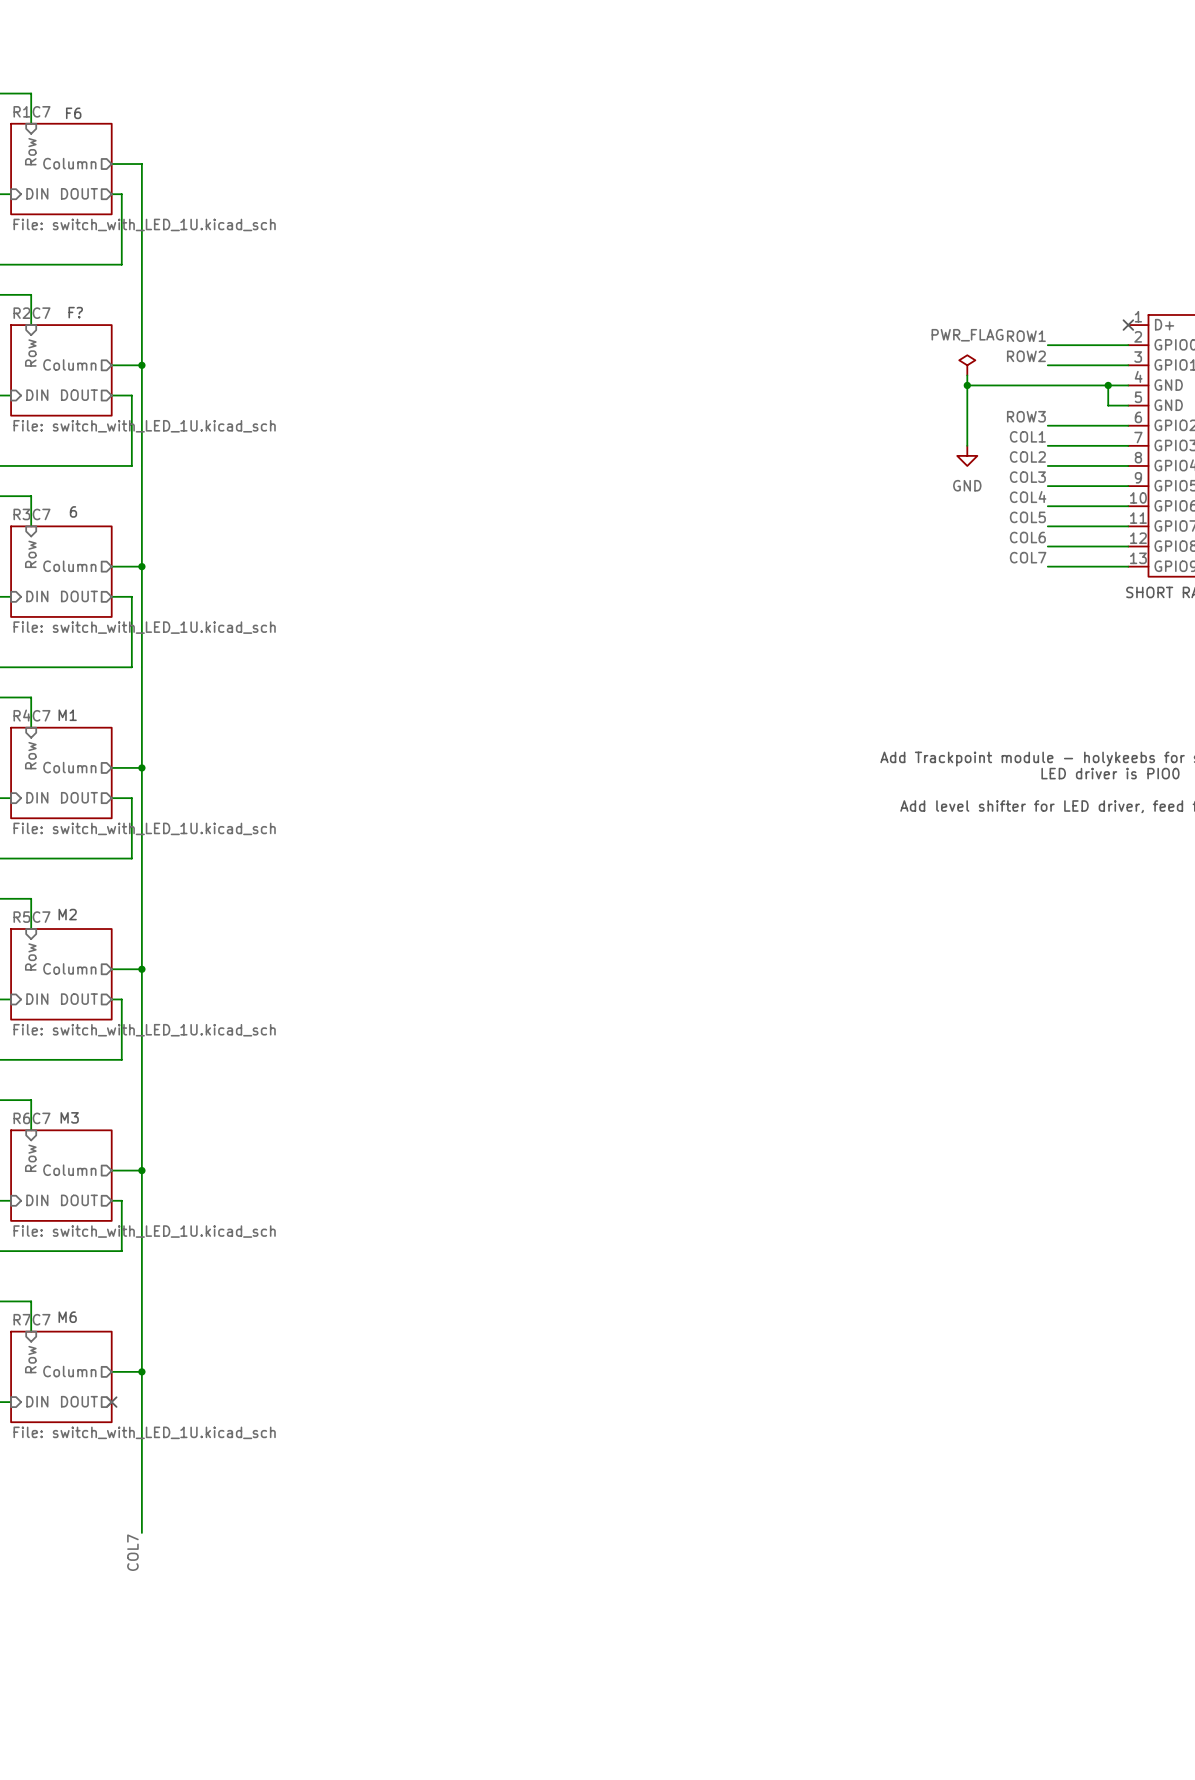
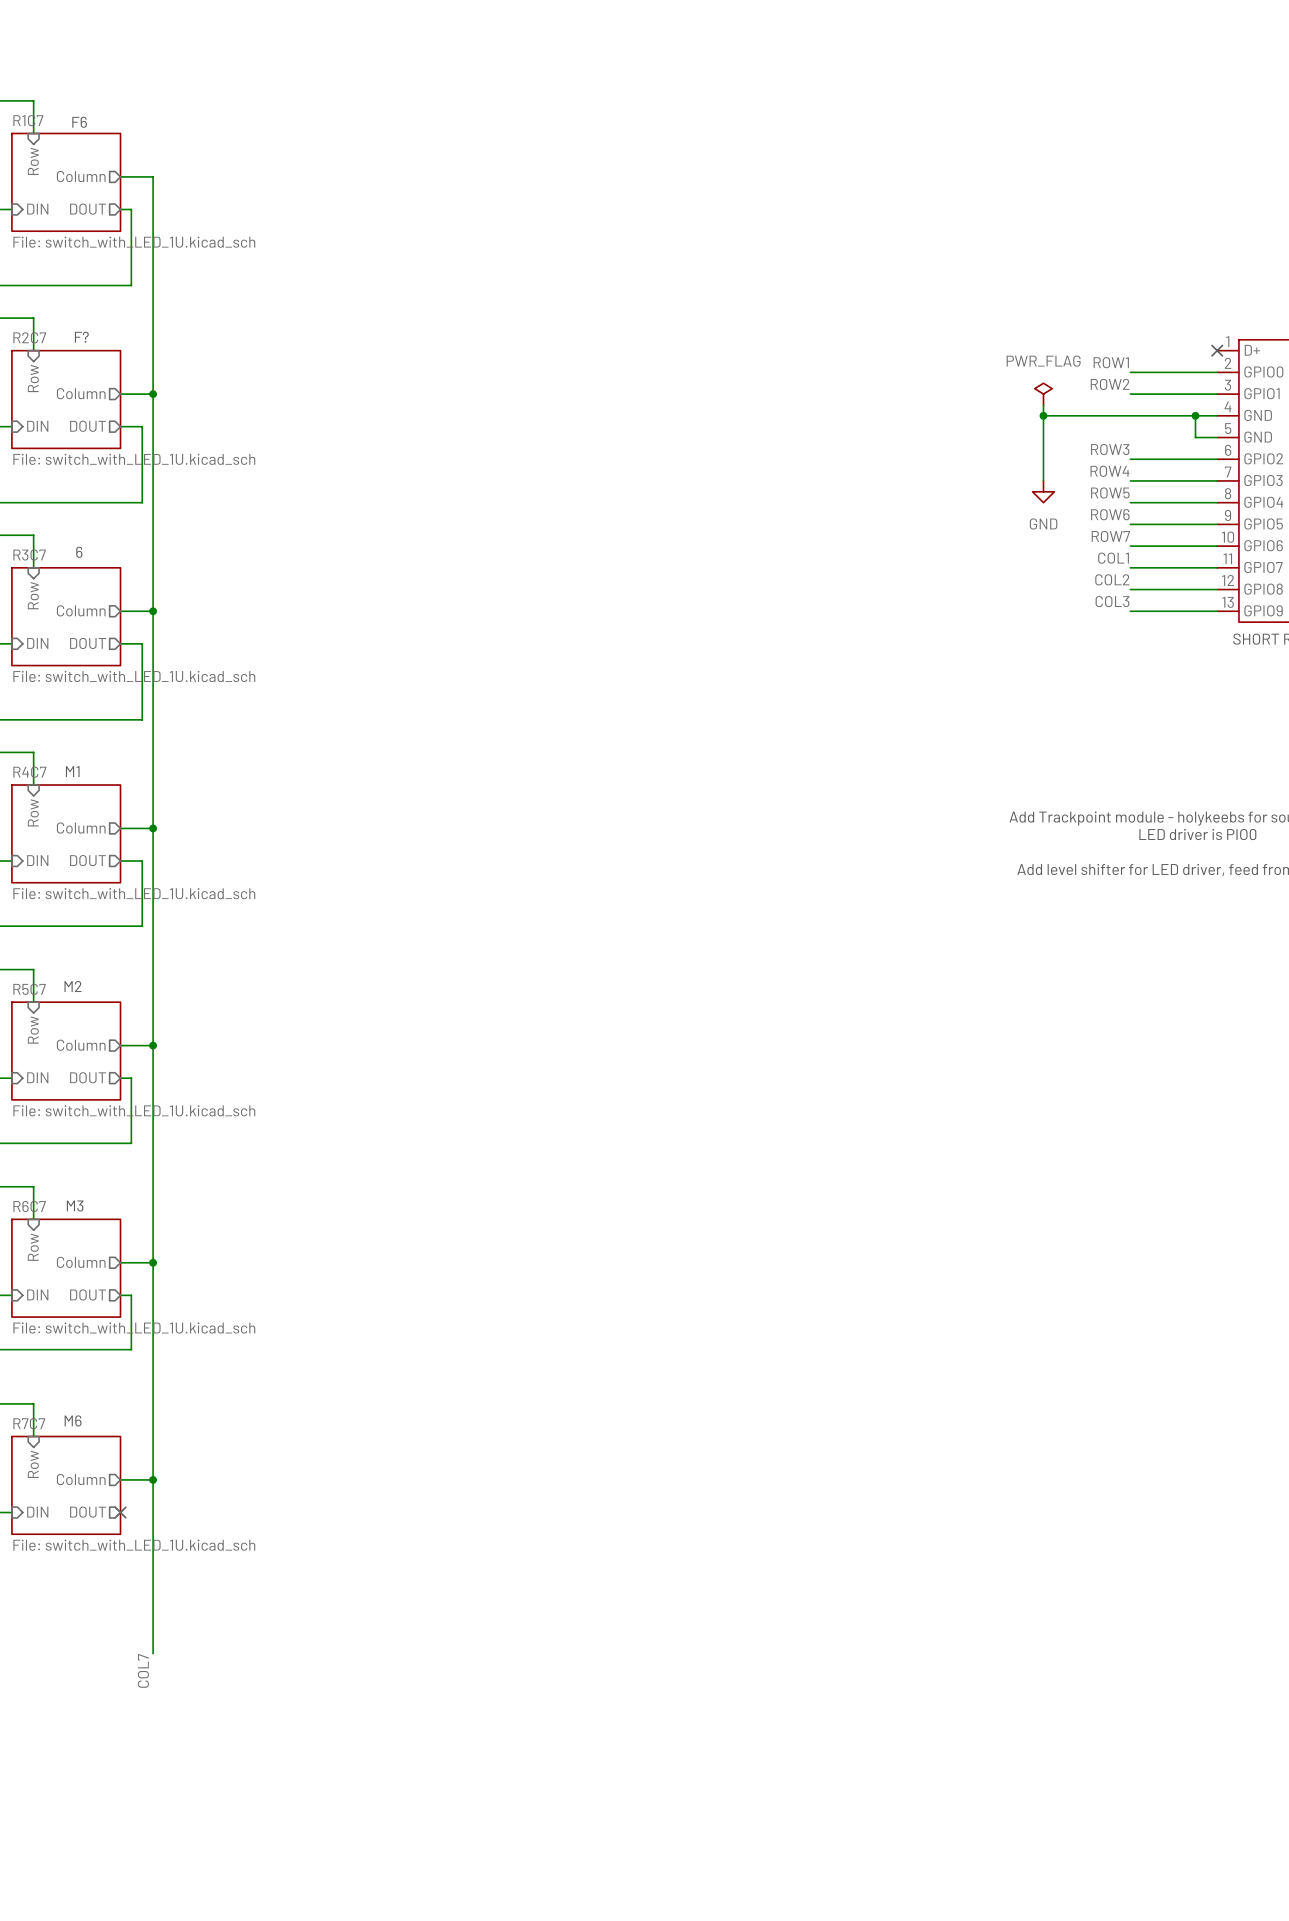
label: COL1 (1027, 436) -> ROW4 (1109, 471)
label: COL2 (1027, 457) -> ROW5 (1110, 492)
label: COL3 (1027, 477) -> ROW6 (1110, 514)
label: COL4 (1028, 497) -> ROW7 (1110, 536)
label: COL5 (1027, 517) -> COL1 (1113, 558)
label: COL6 (1027, 537) -> COL2 (1112, 579)
label: COL7 (1028, 557) -> COL3 (1112, 601)

